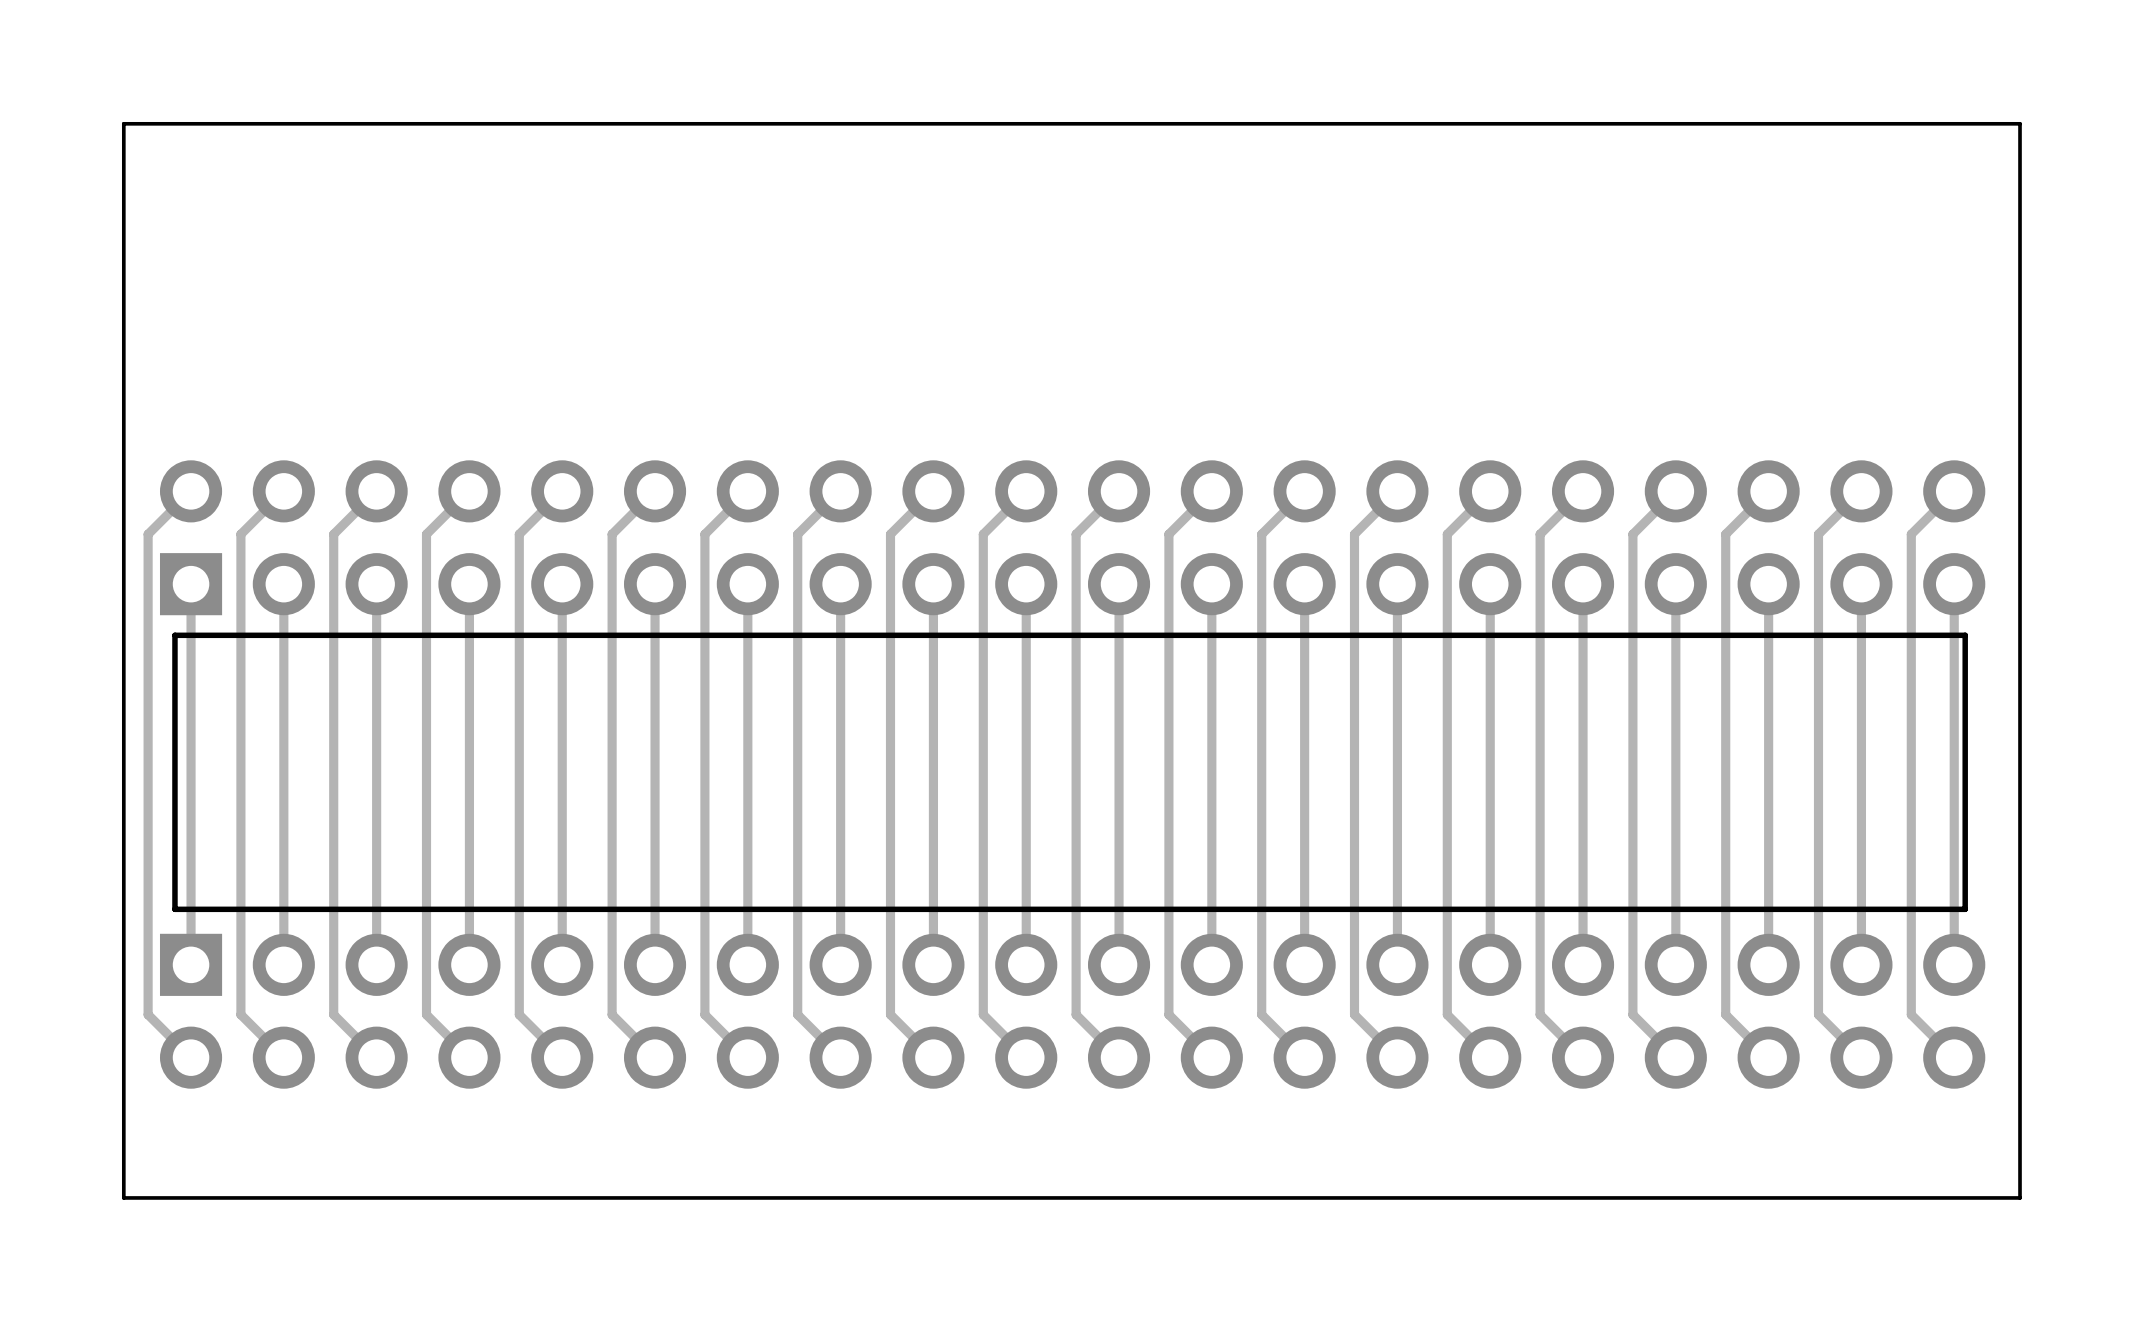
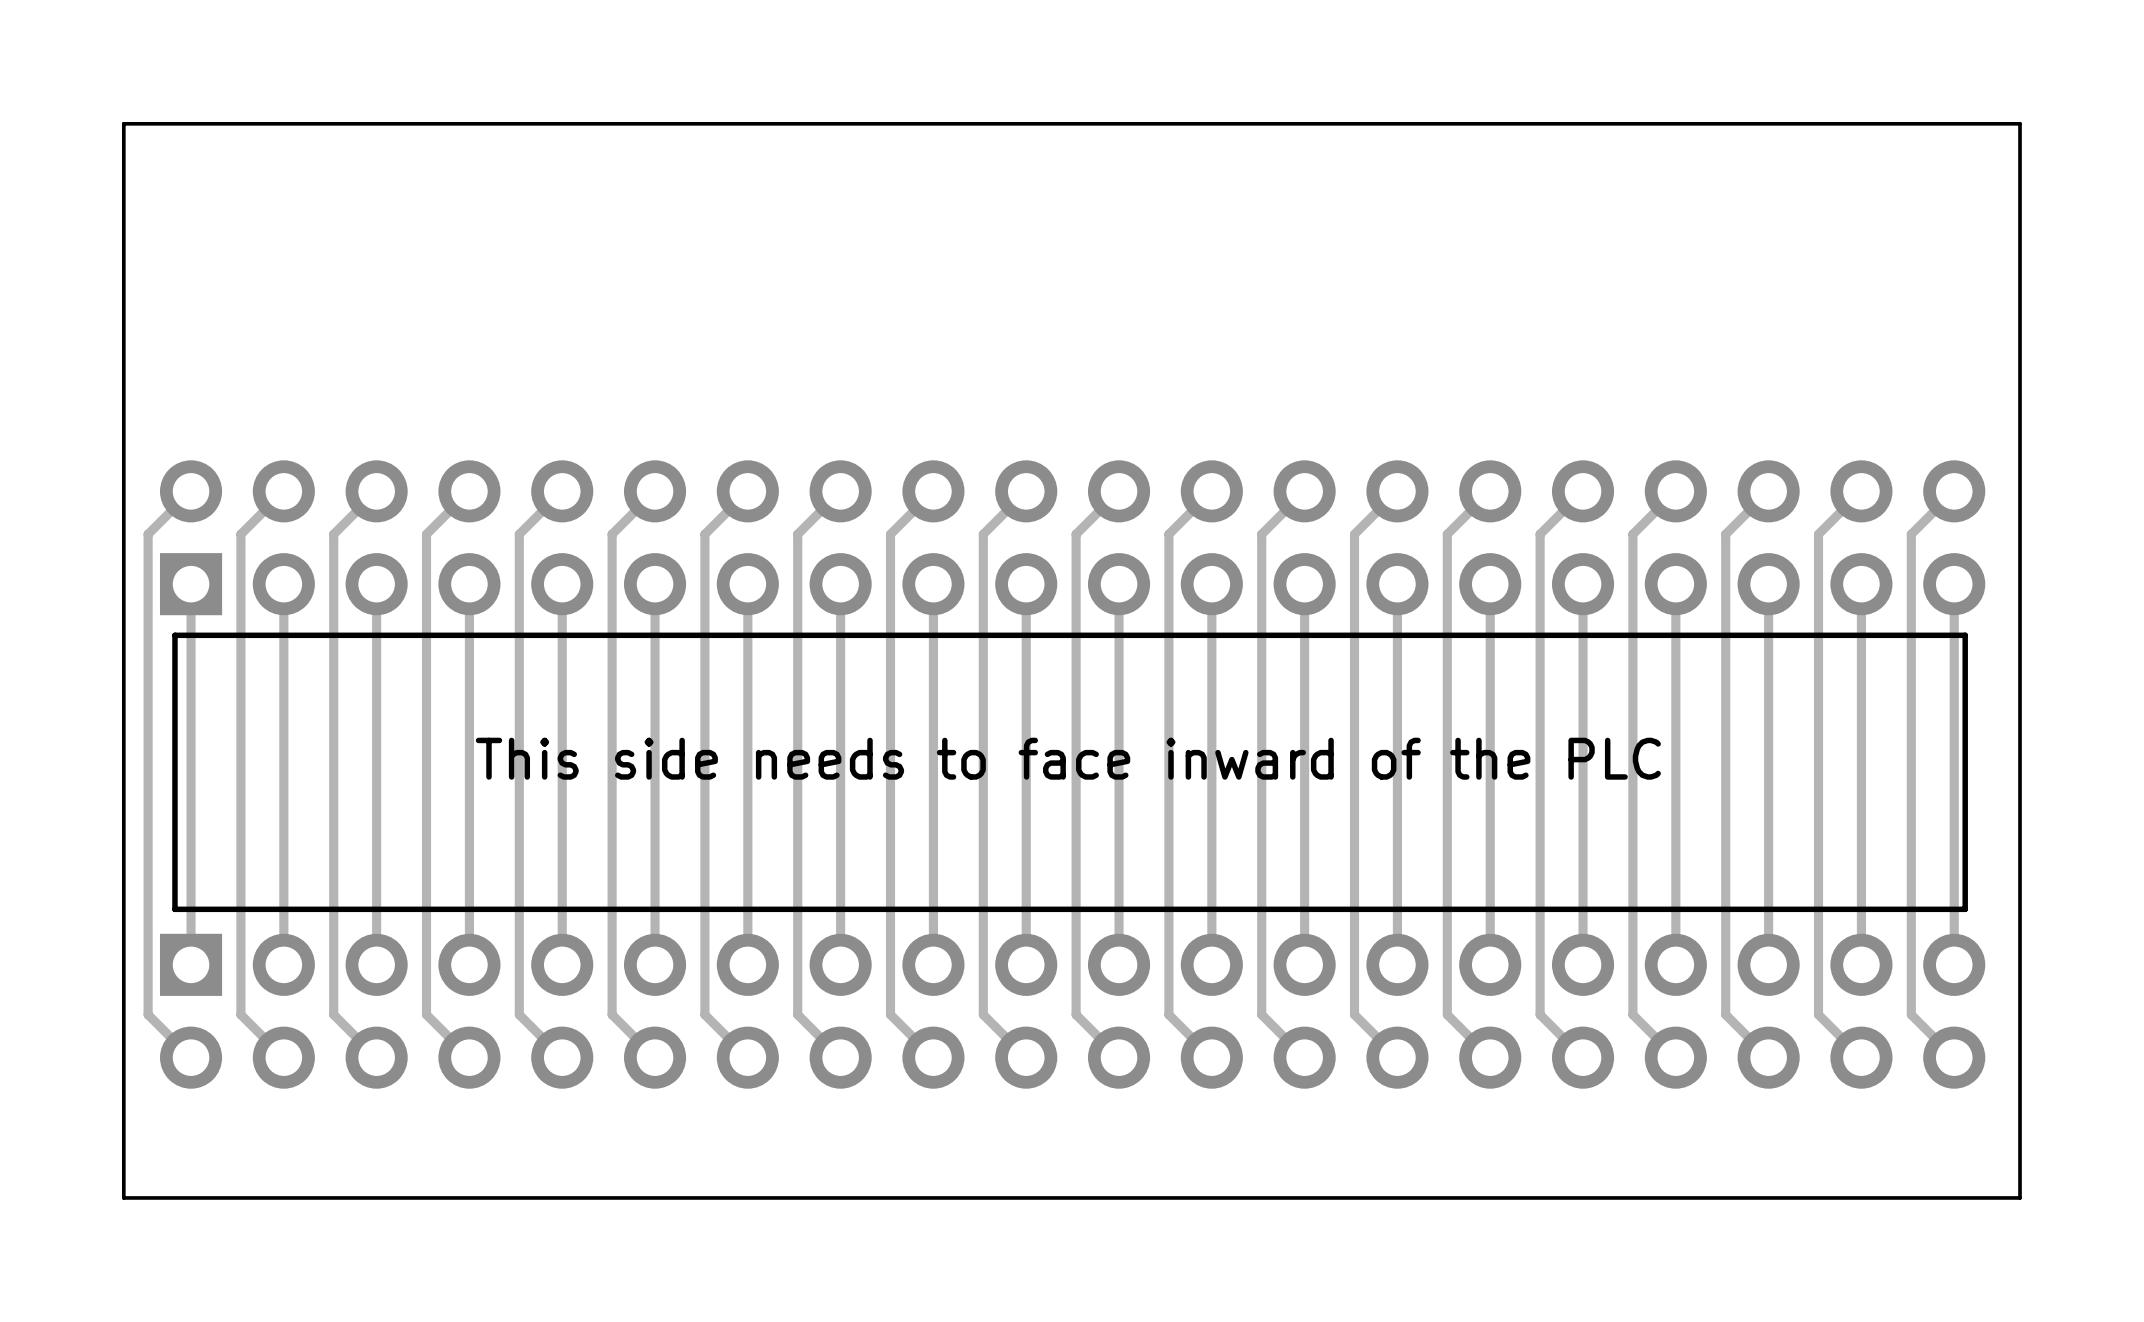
text: none -> This side needs to face inward of the PLC (1068, 758)

